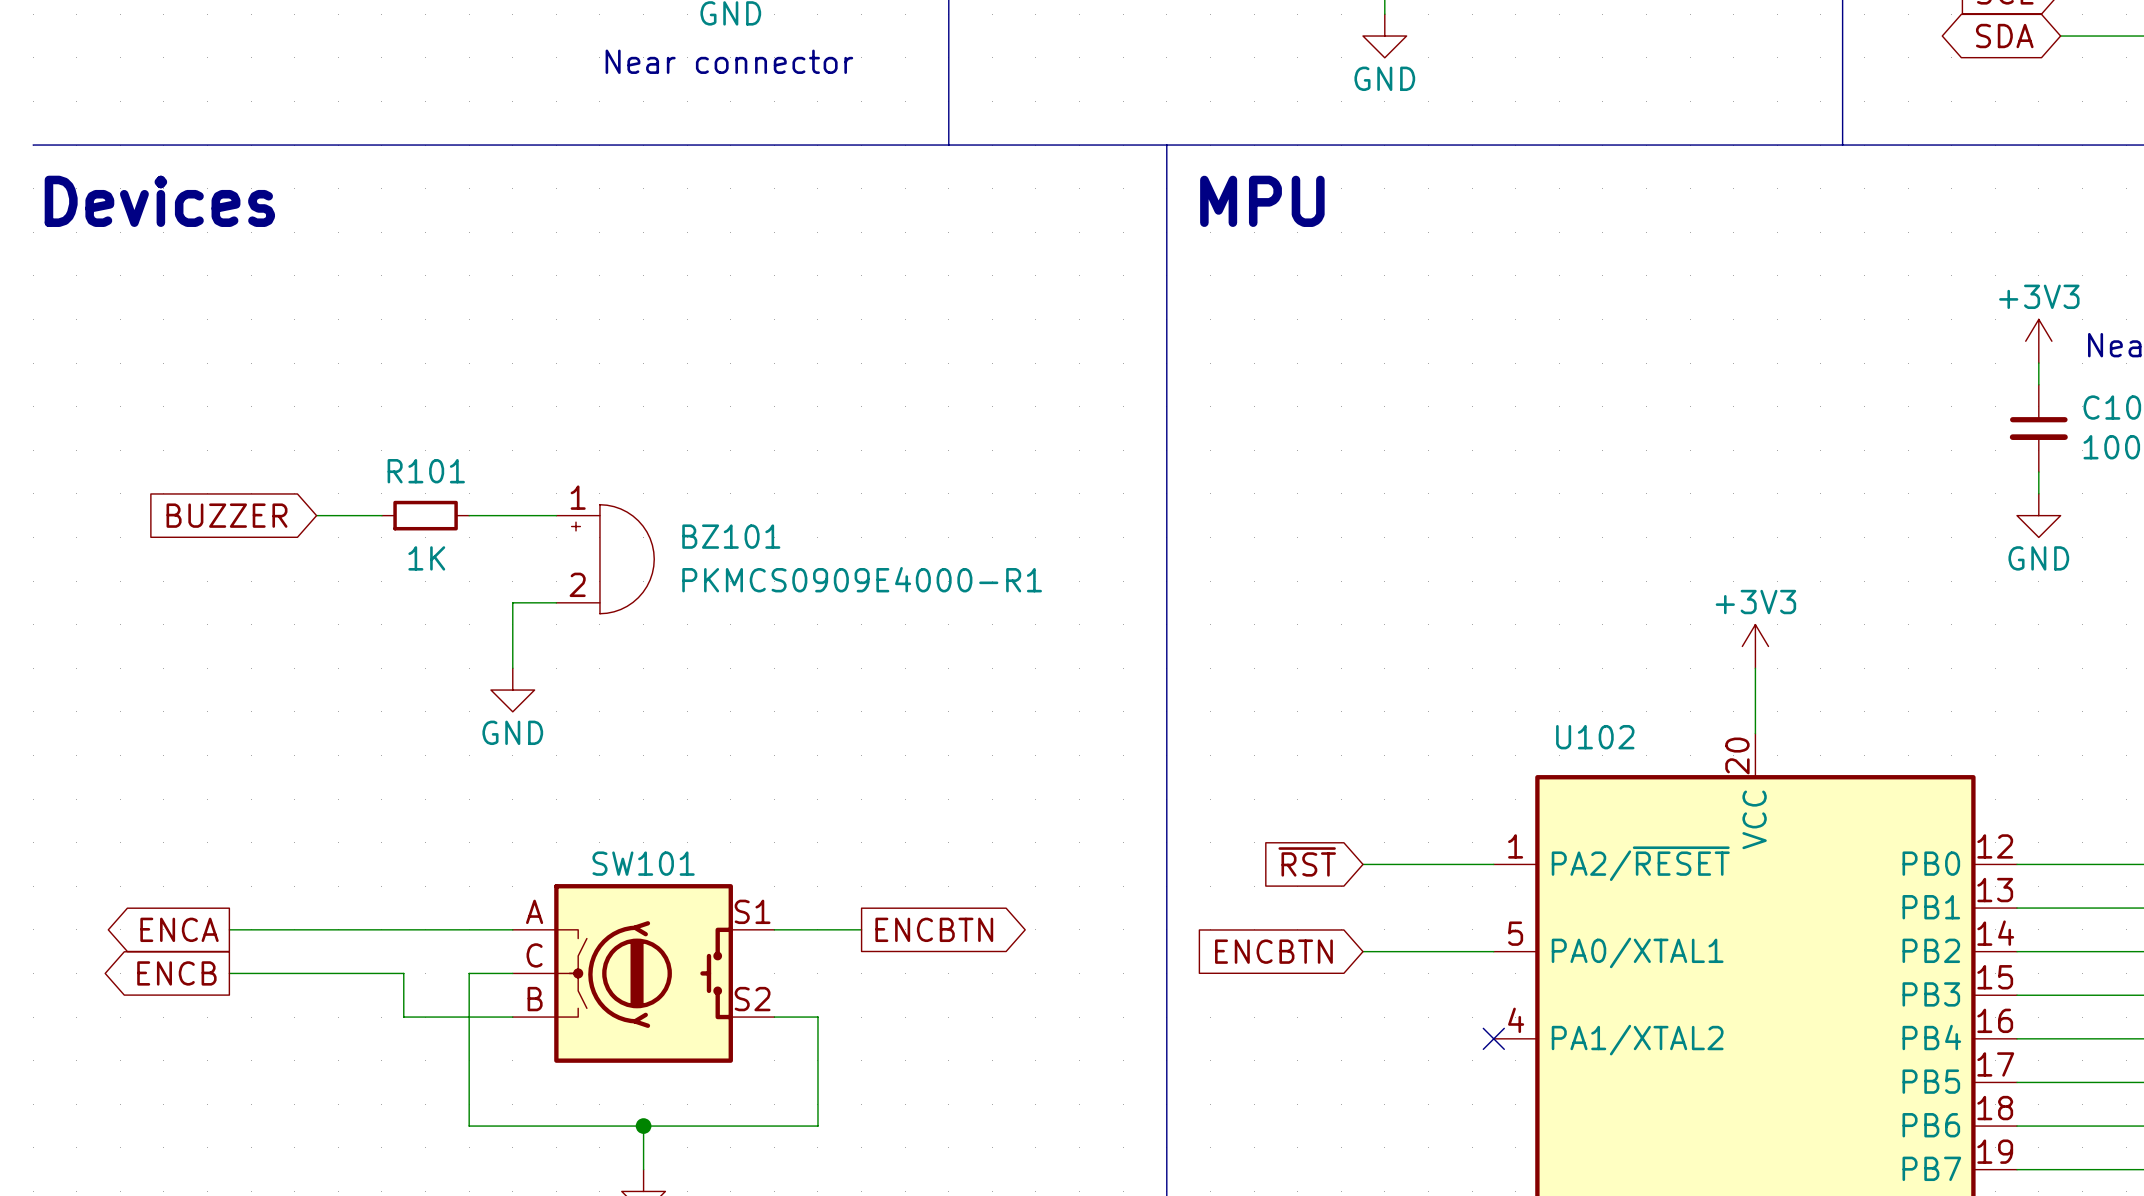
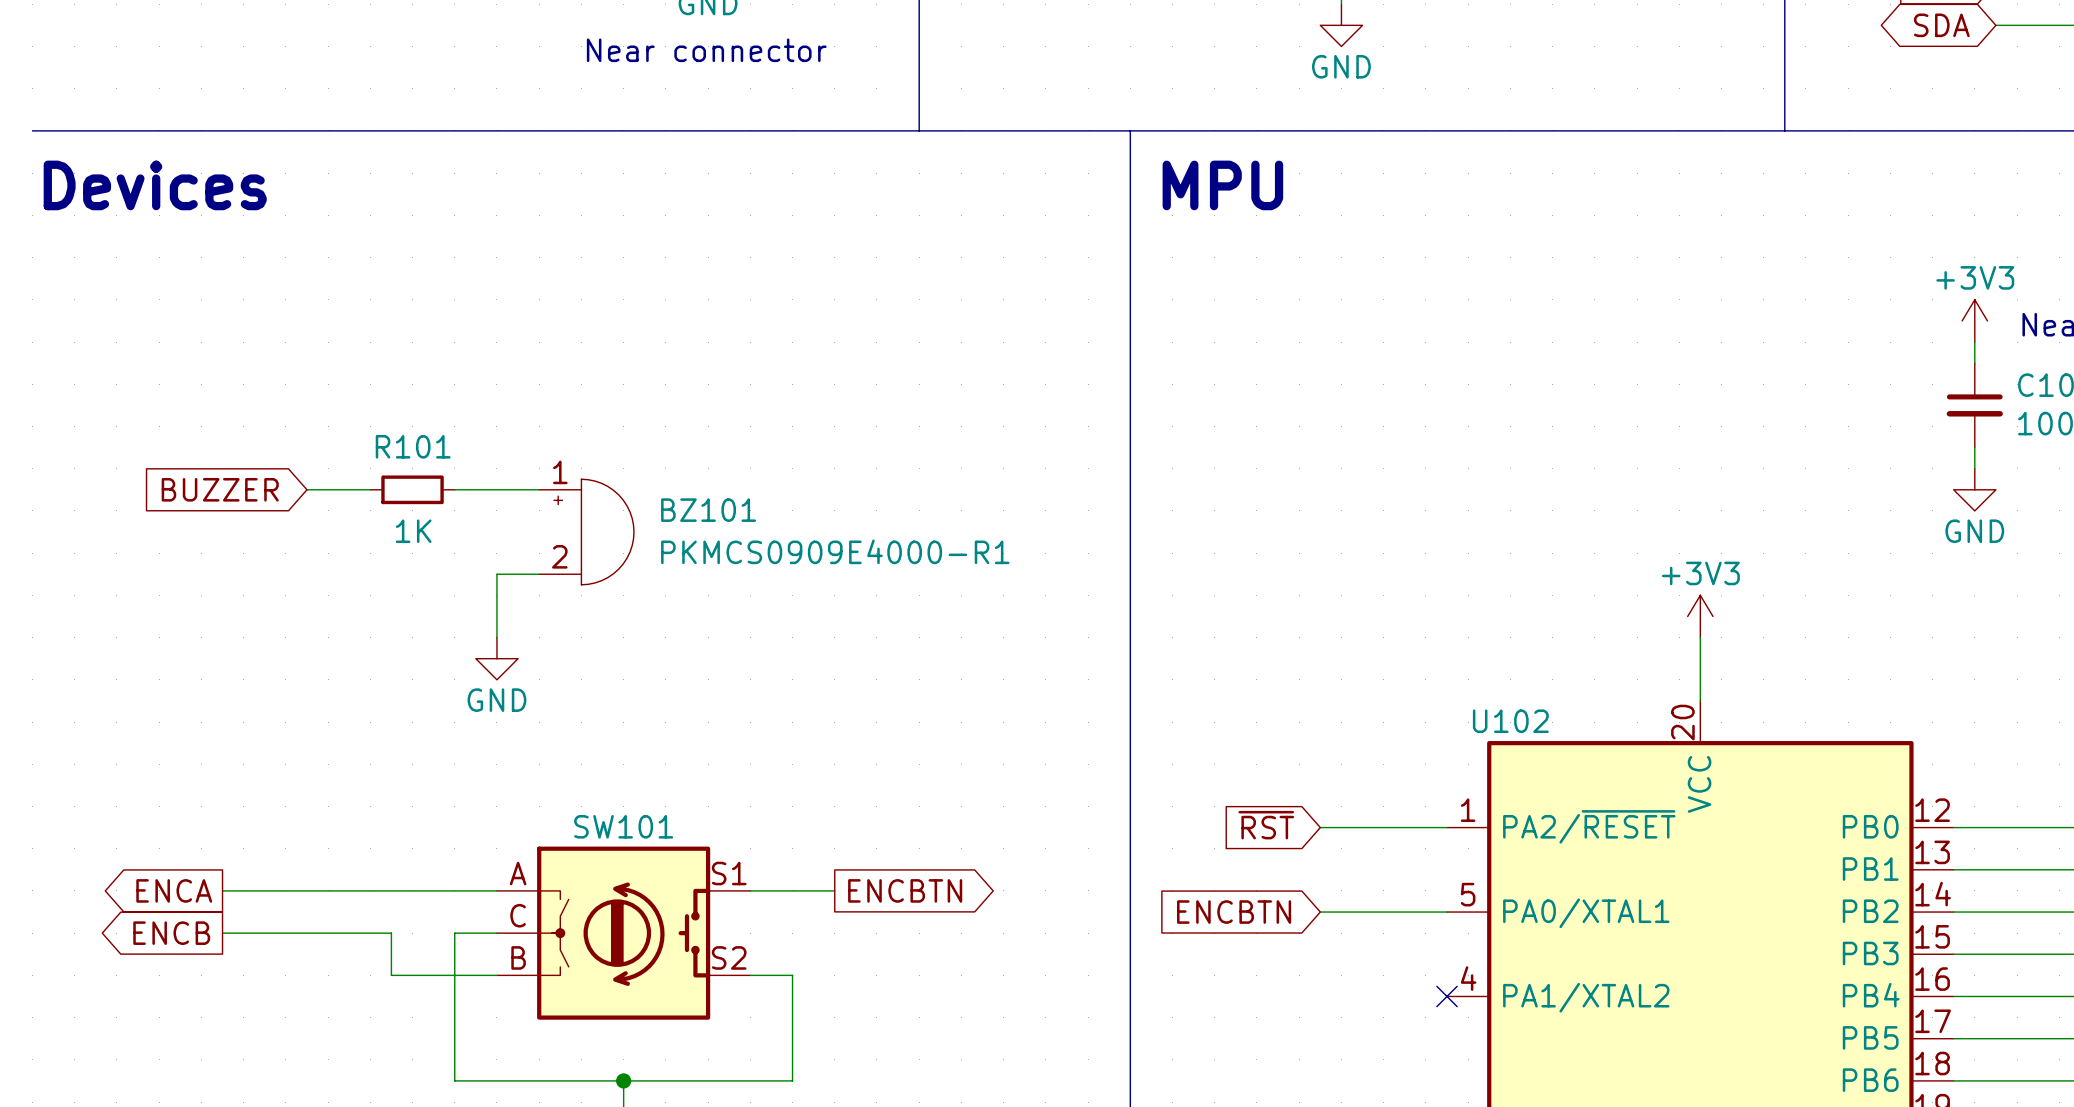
U102 name position: U102 (1595, 737) -> U102 (1510, 721)
SW101 symbol: [512, 884, 775, 1063] -> [496, 846, 751, 1020]

